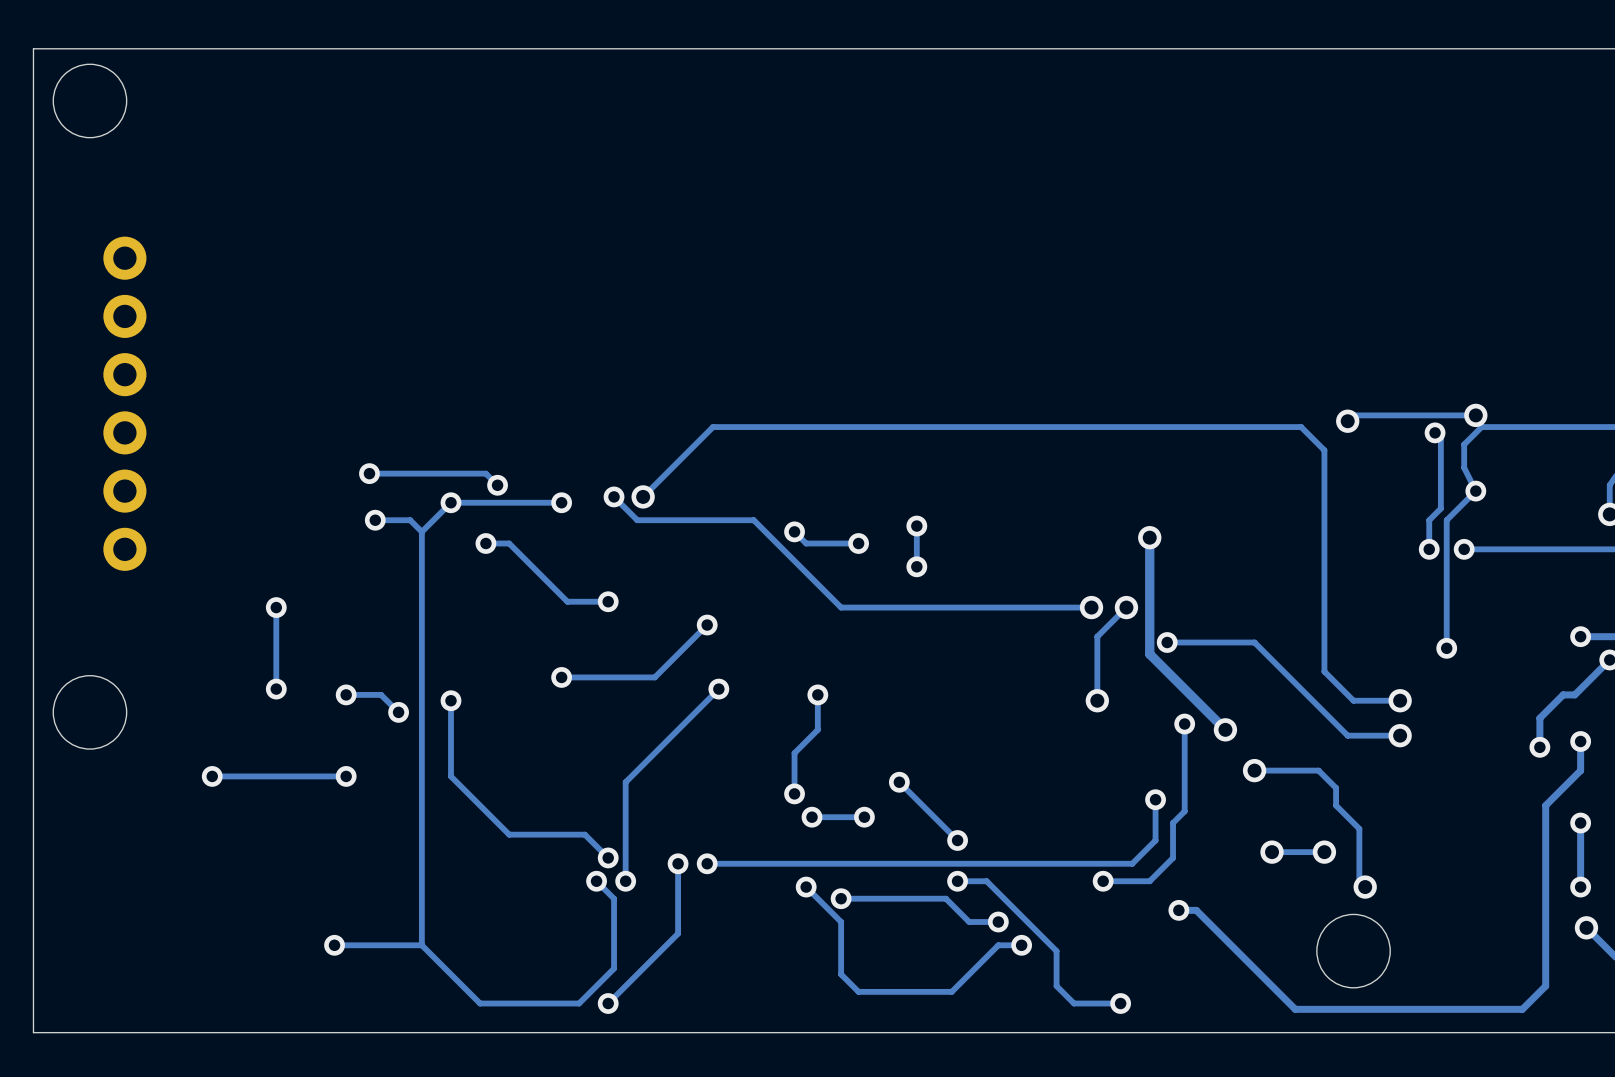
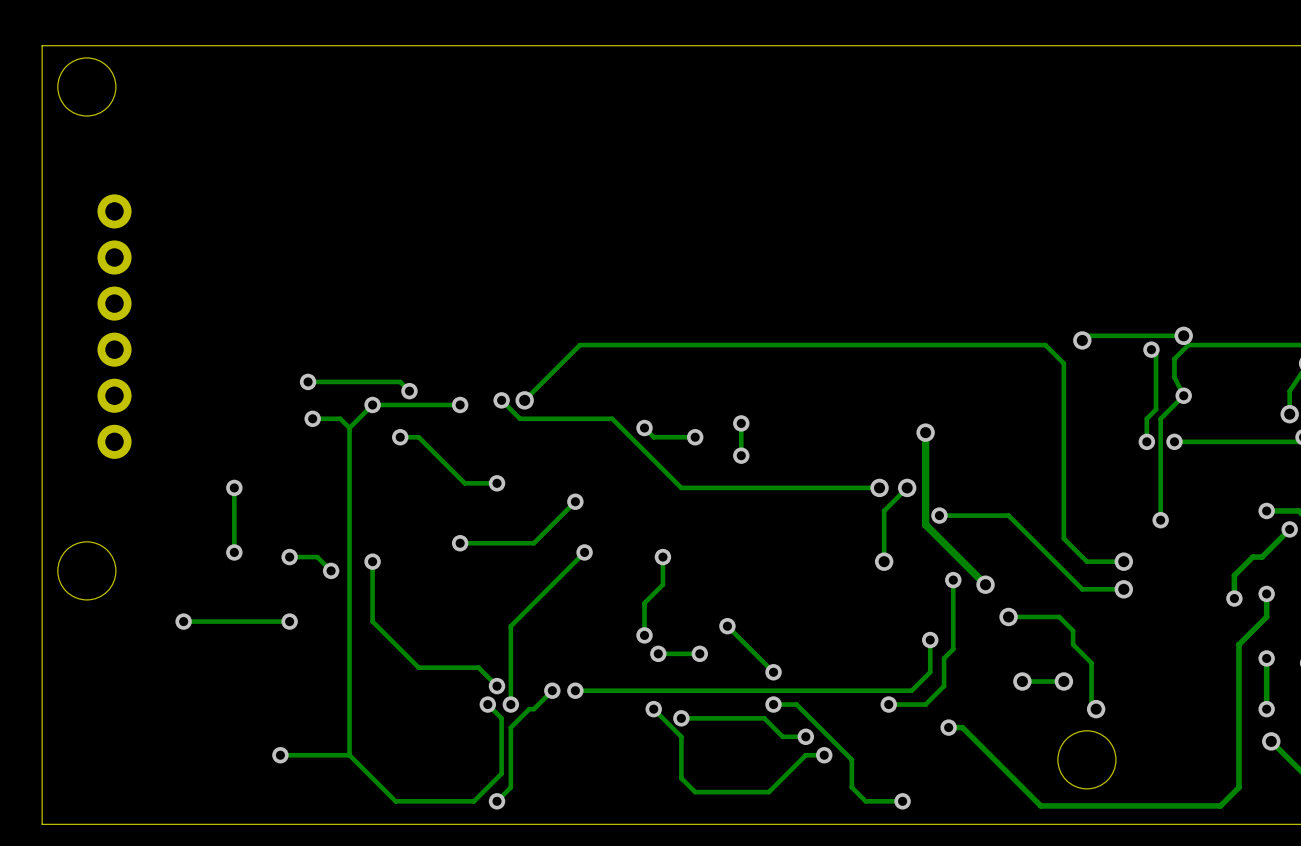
track: (678, 863) (678, 933) (625, 986) -> (552, 690) (533, 709) (529, 709) (510, 727) (510, 787)

